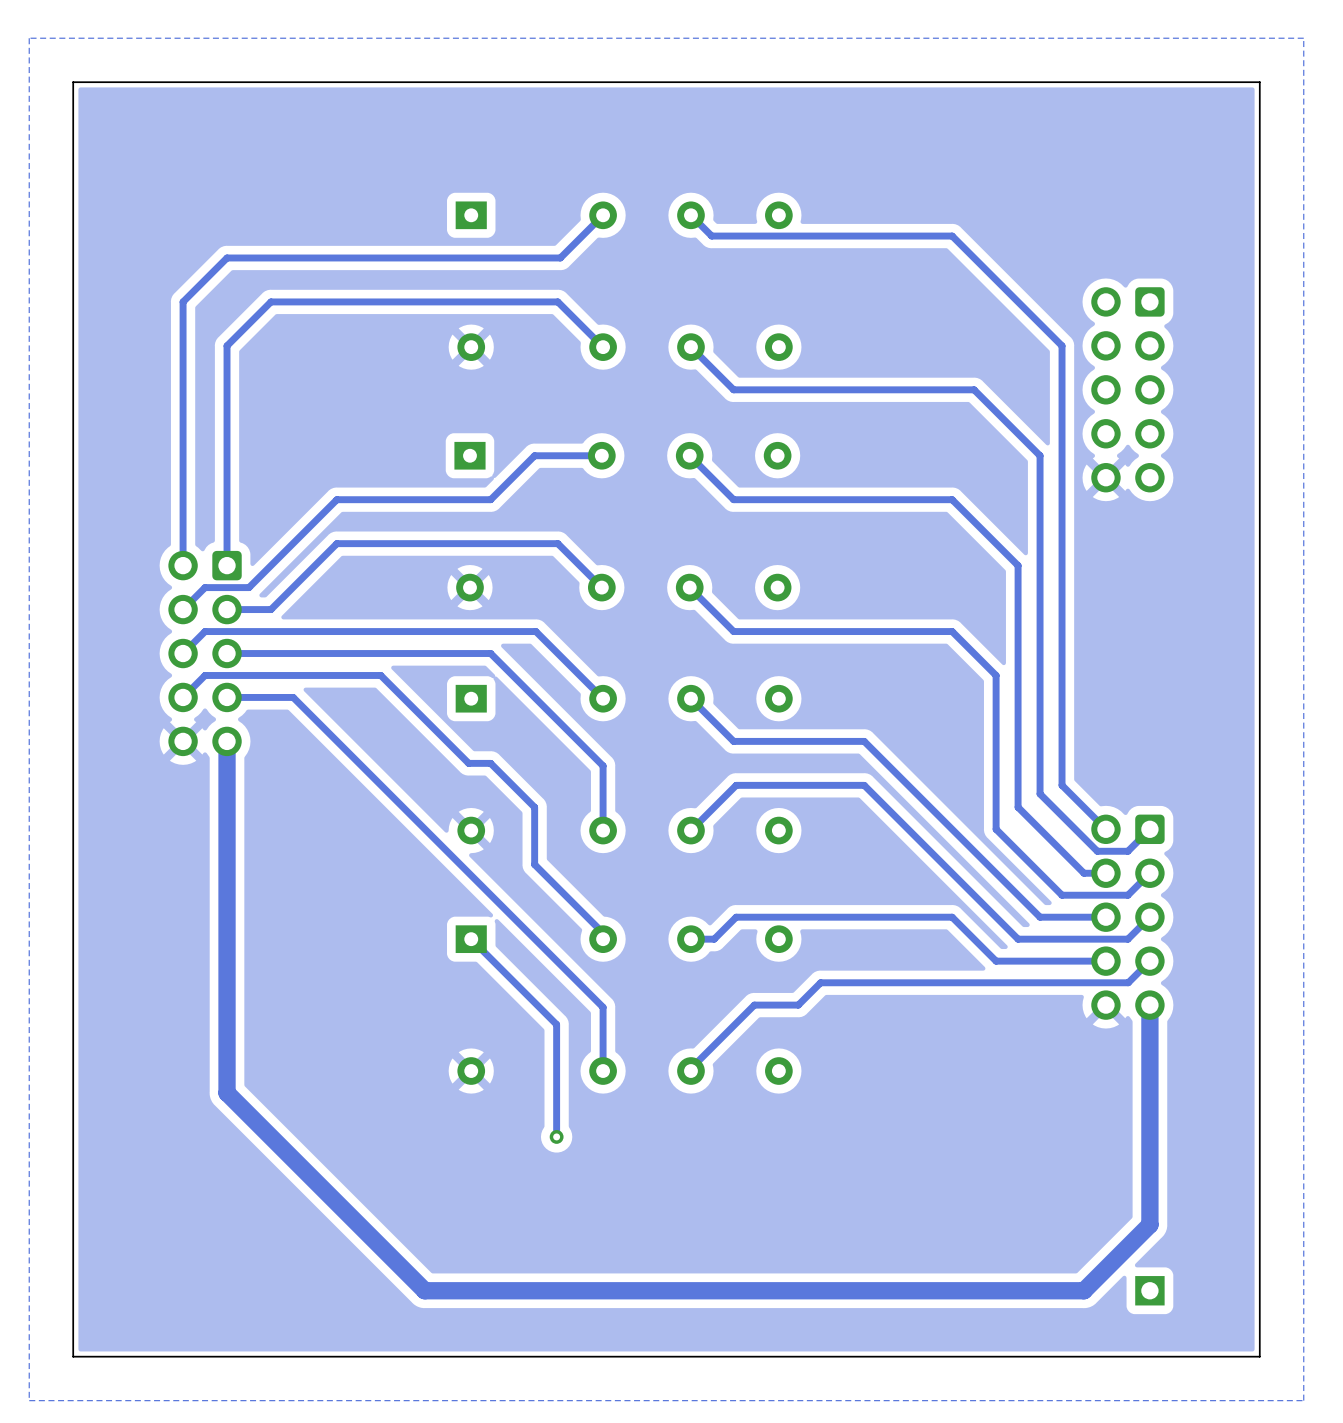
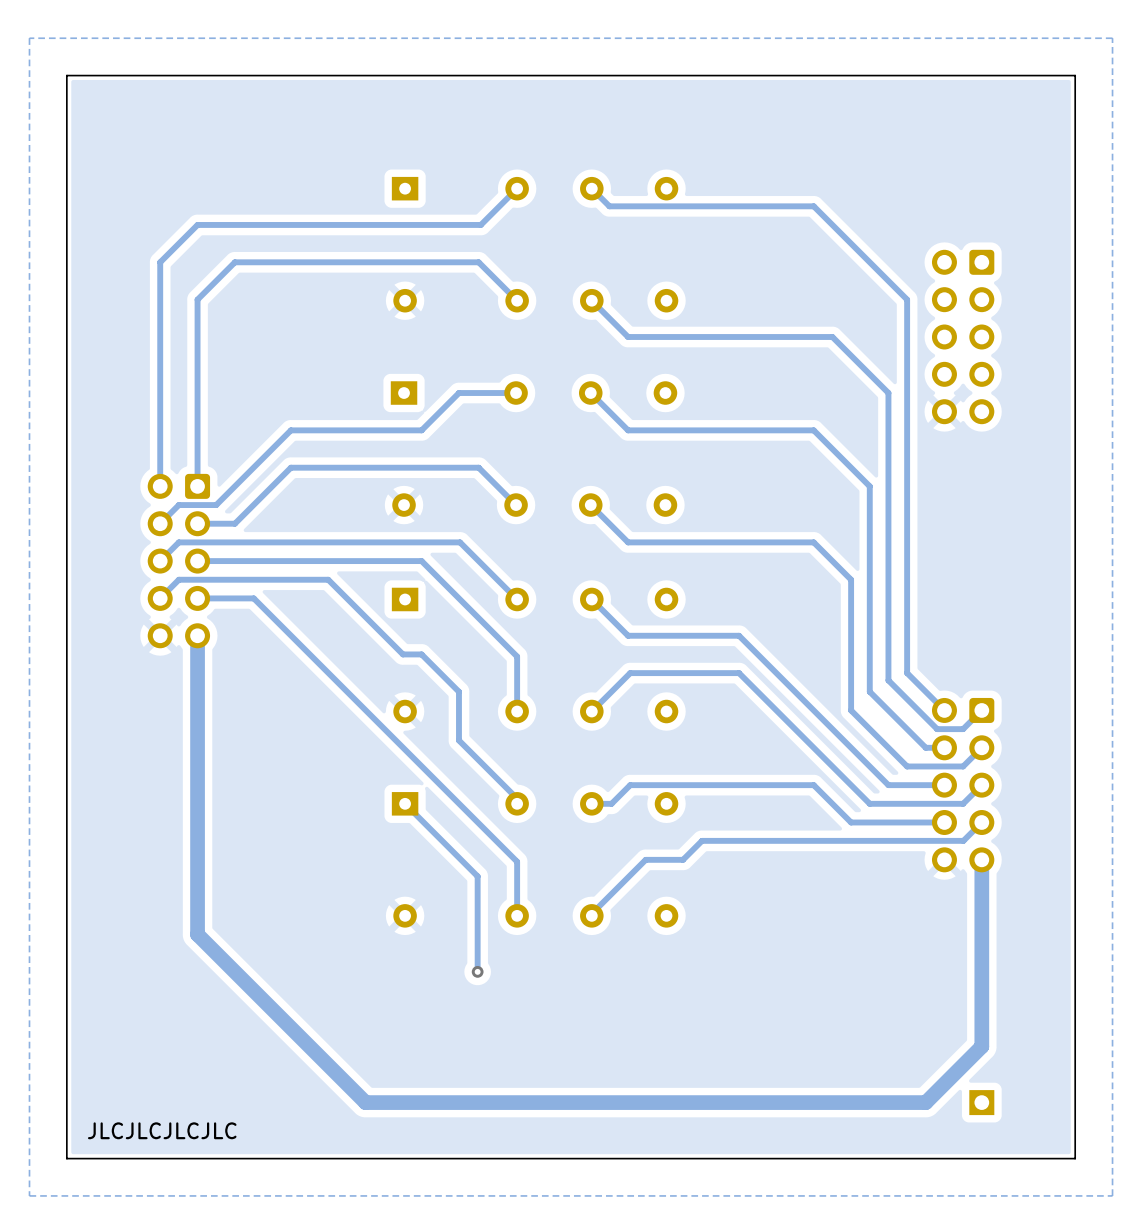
text: none -> JLCJLCJLCJLC (162, 1130)

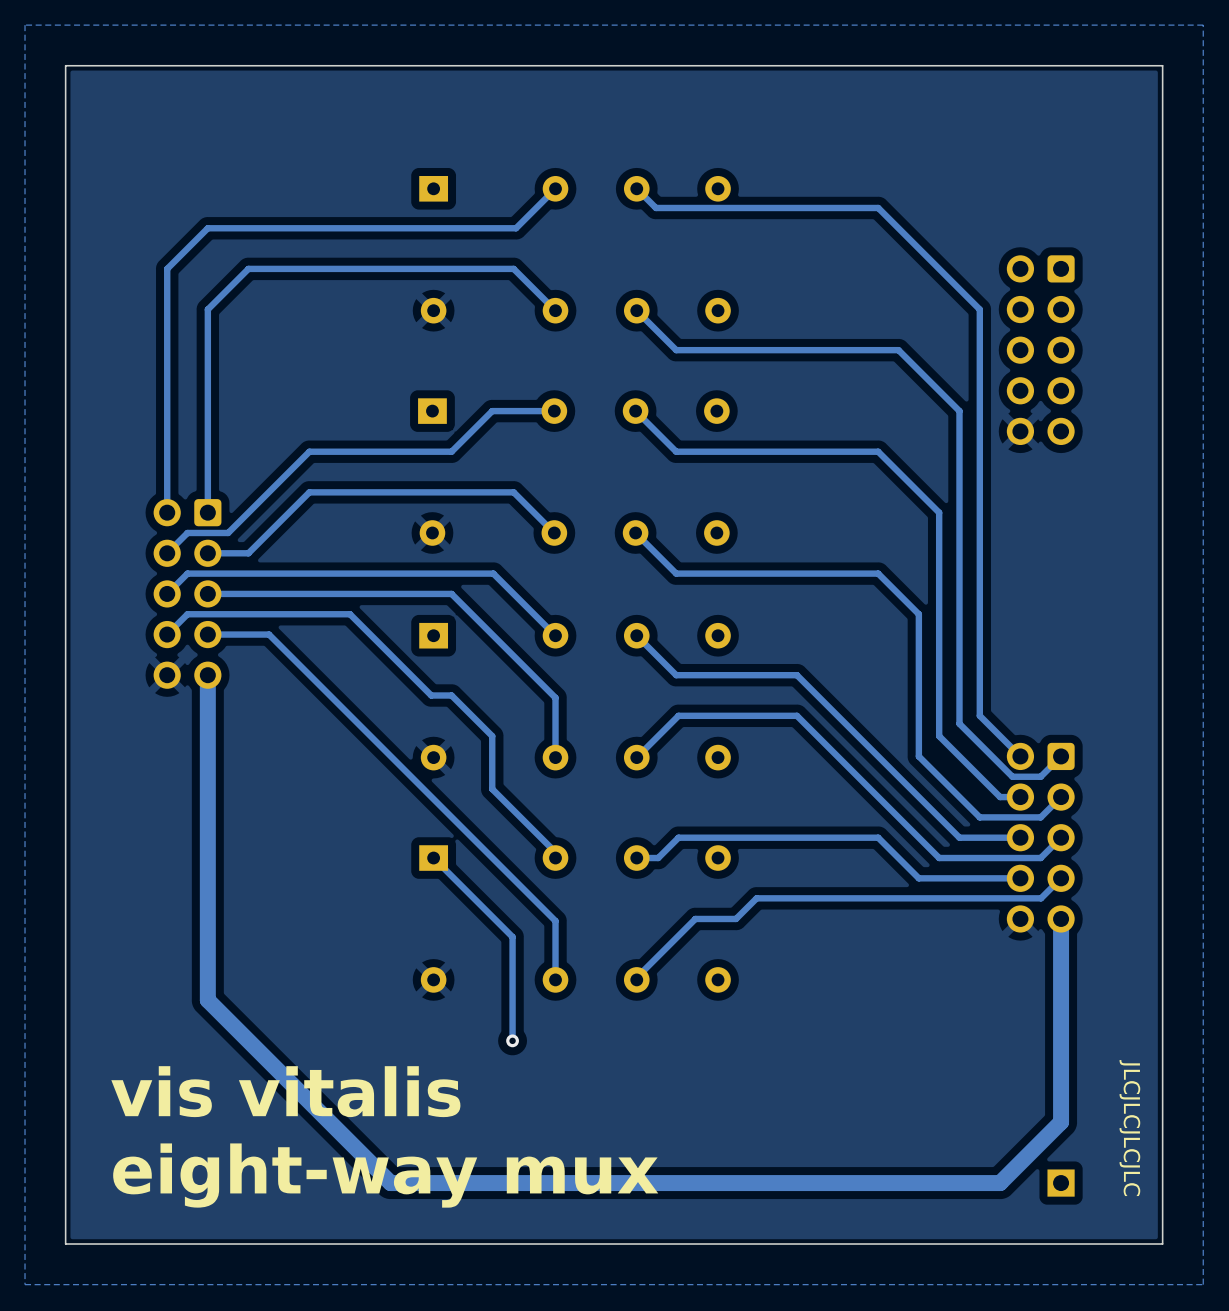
text: none -> vis vitalis (285, 1091)
text: none -> JLCJLCJLCJLC (1129, 1128)
text: none -> eight-way mux (385, 1175)
text: JLCJLCJLCJLC (162, 1130) -> none

